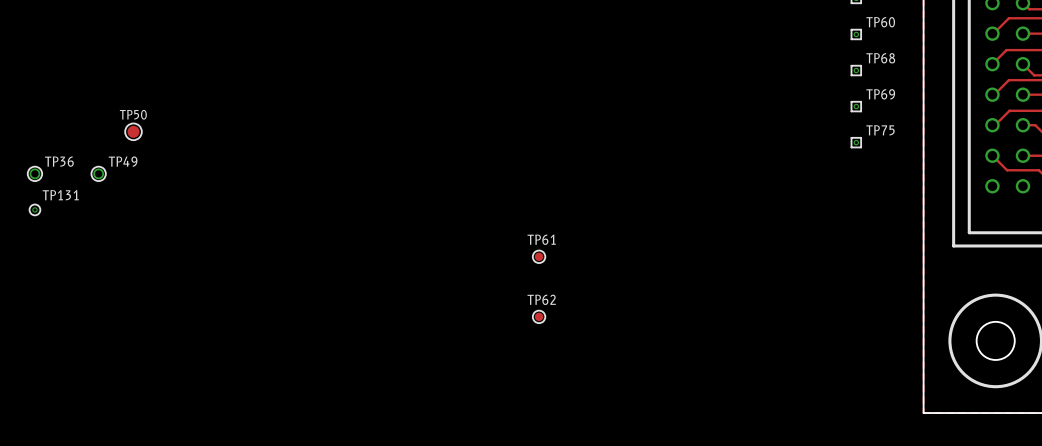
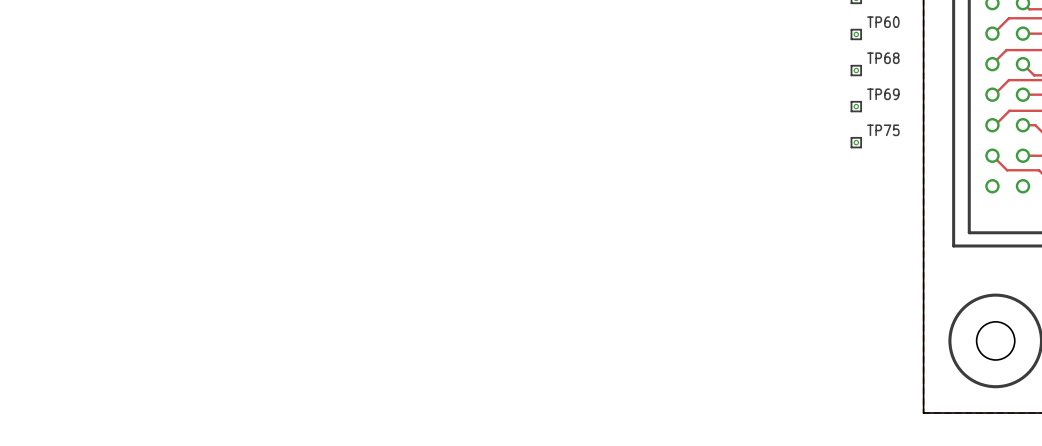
TP50: (133, 131) -> none
TP36: (34, 173) -> none
TP49: (98, 173) -> none
TP131: (34, 209) -> none
TP61: (539, 256) -> none
TP62: (539, 316) -> none

